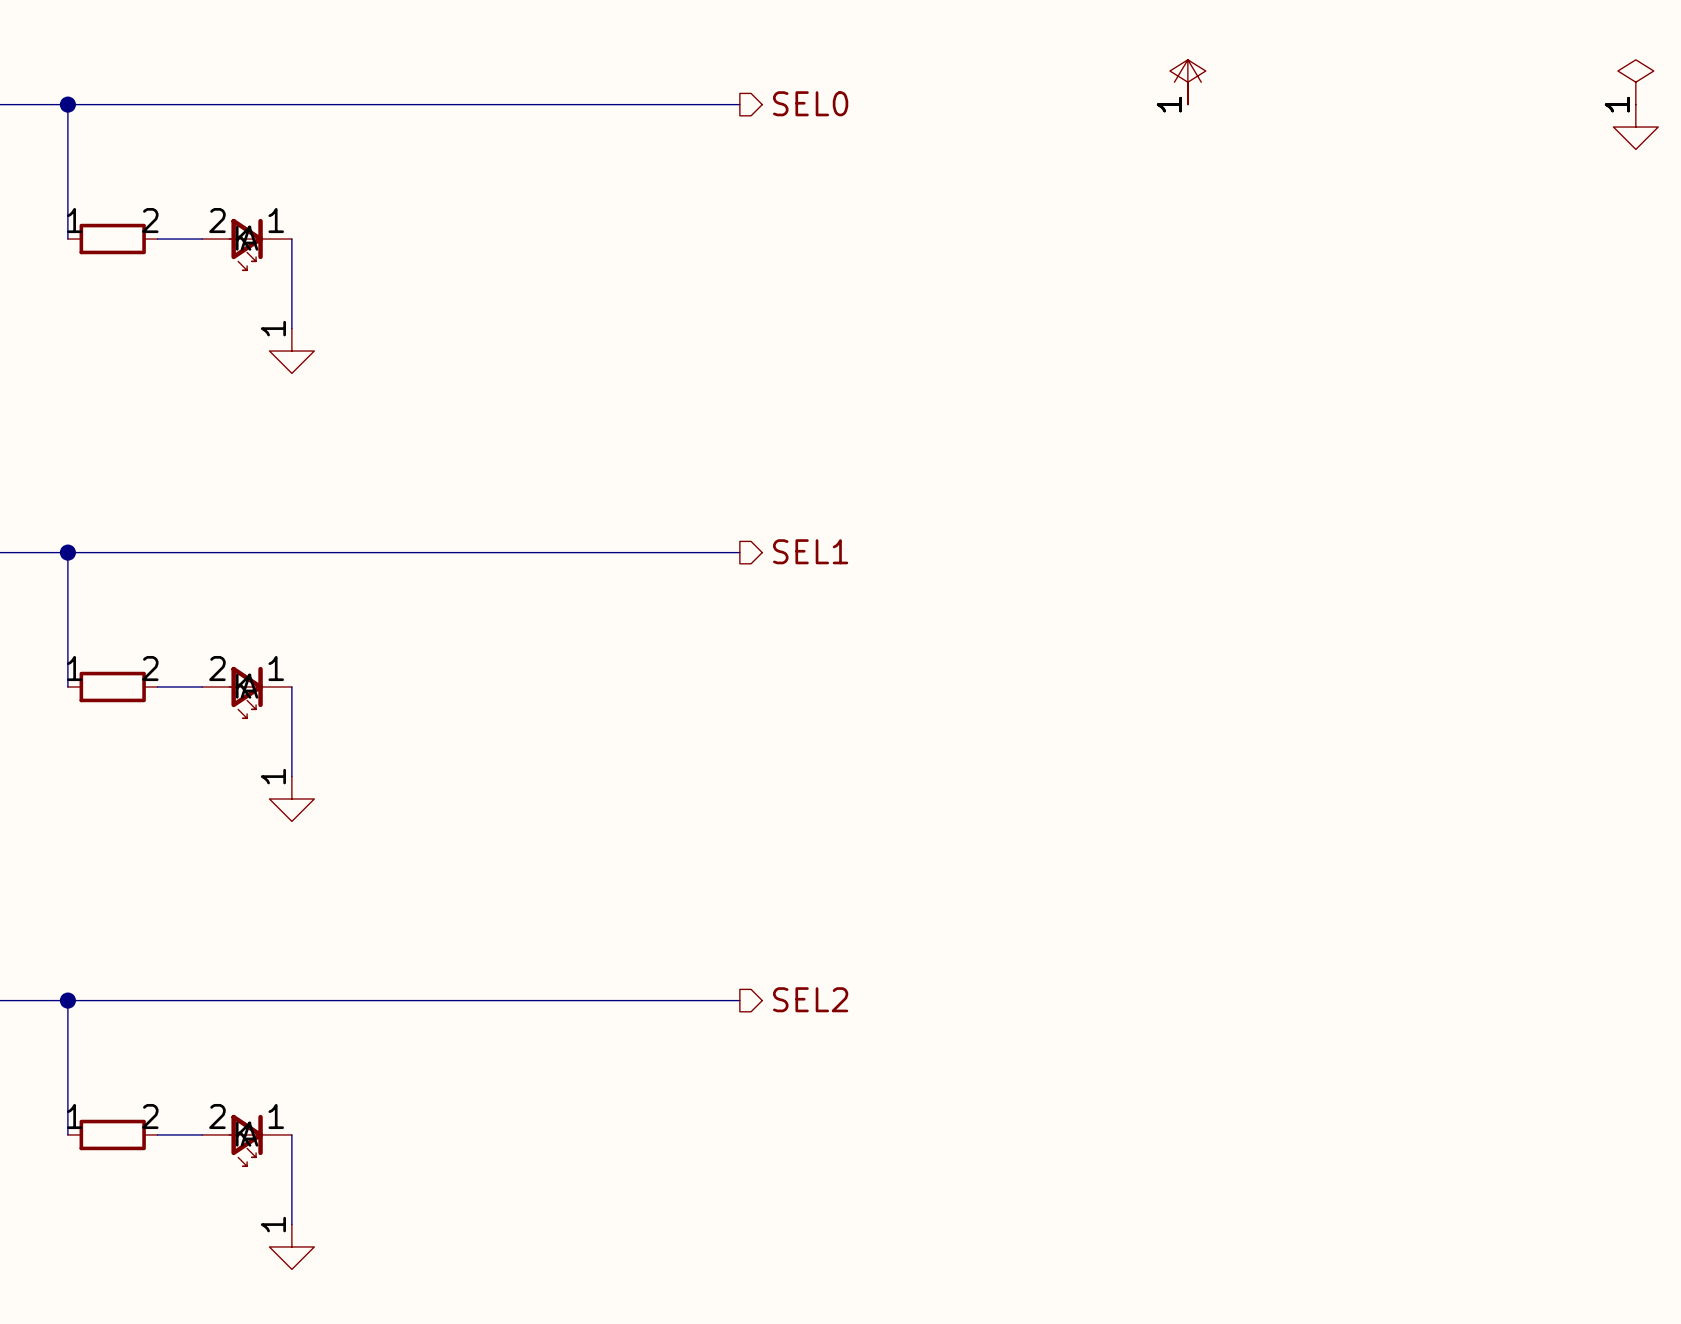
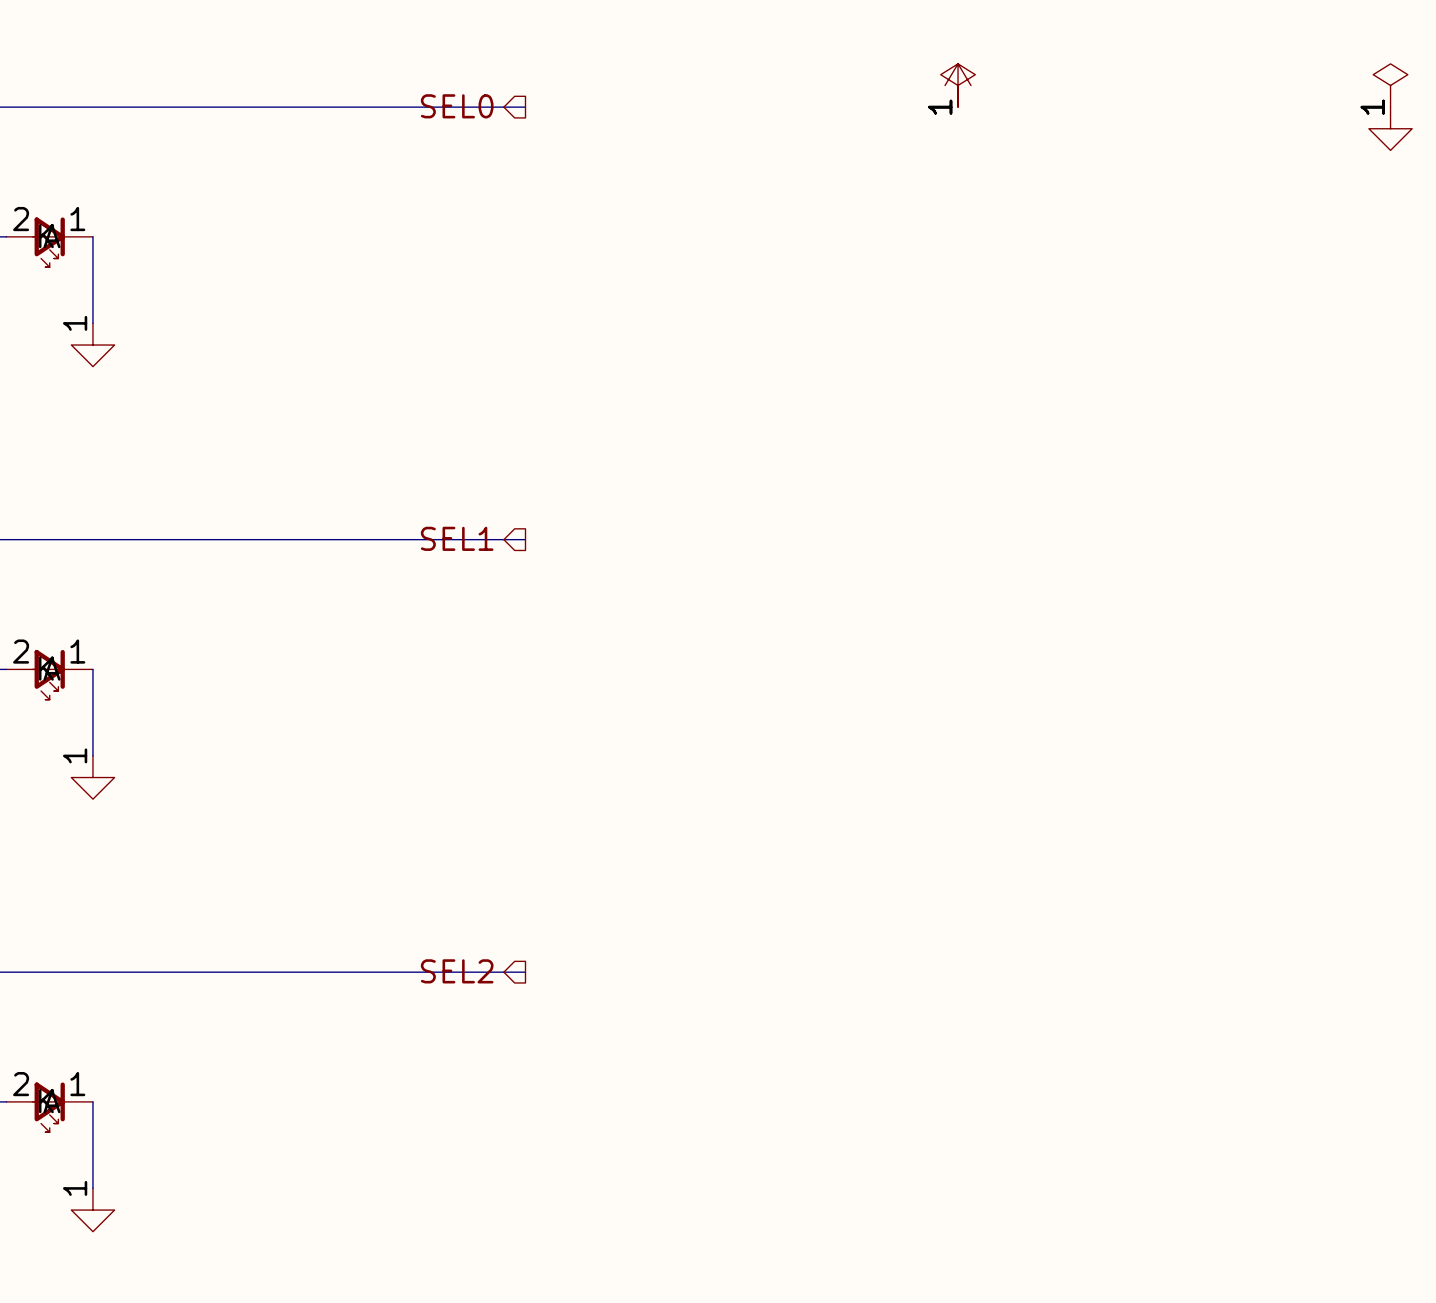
hierarchical label rotation: 0° (810, 103) -> 180° (457, 106)
hierarchical label position: SEL0 (810, 103) -> SEL0 (457, 106)
hierarchical label rotation: 0° (810, 551) -> 180° (457, 538)
hierarchical label position: SEL1 (810, 551) -> SEL1 (457, 538)
hierarchical label rotation: 0° (810, 999) -> 180° (457, 971)
hierarchical label position: SEL2 (810, 999) -> SEL2 (457, 971)

